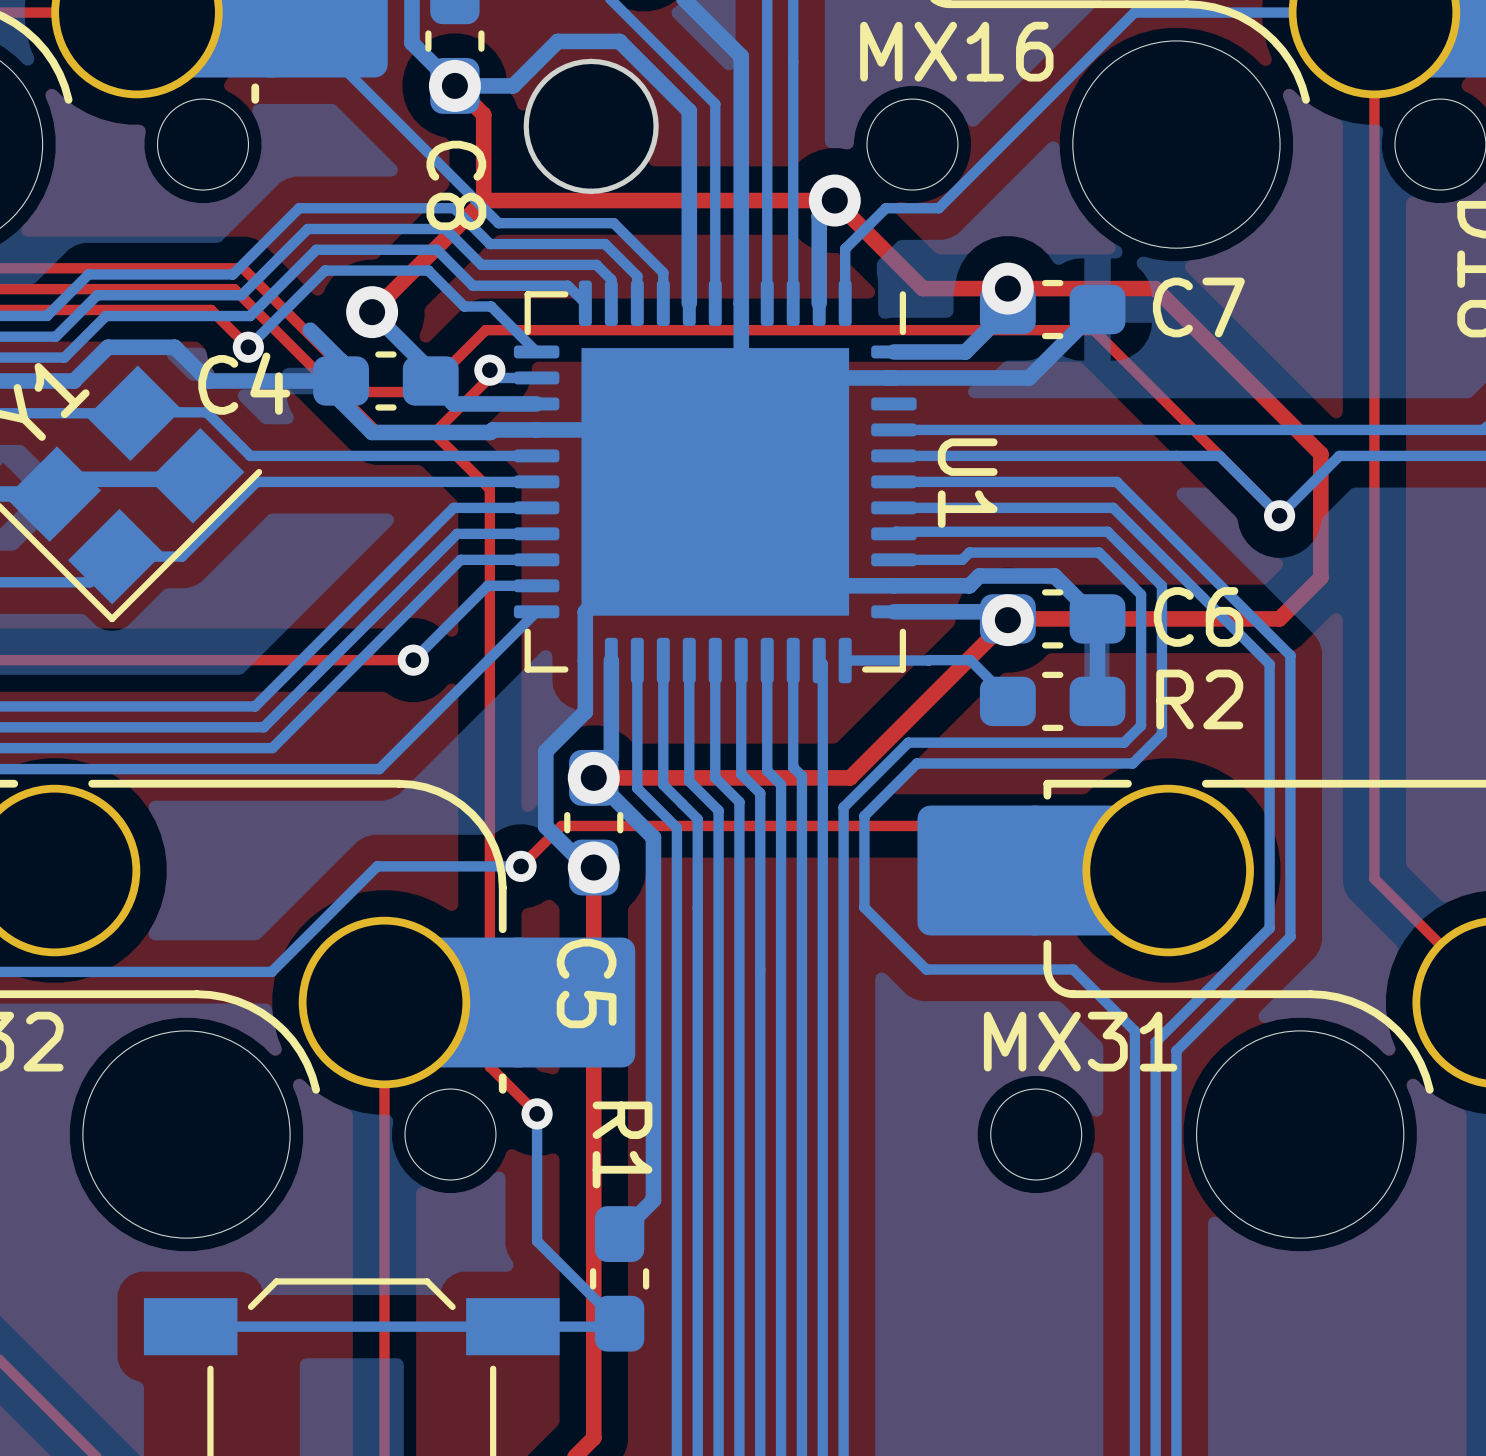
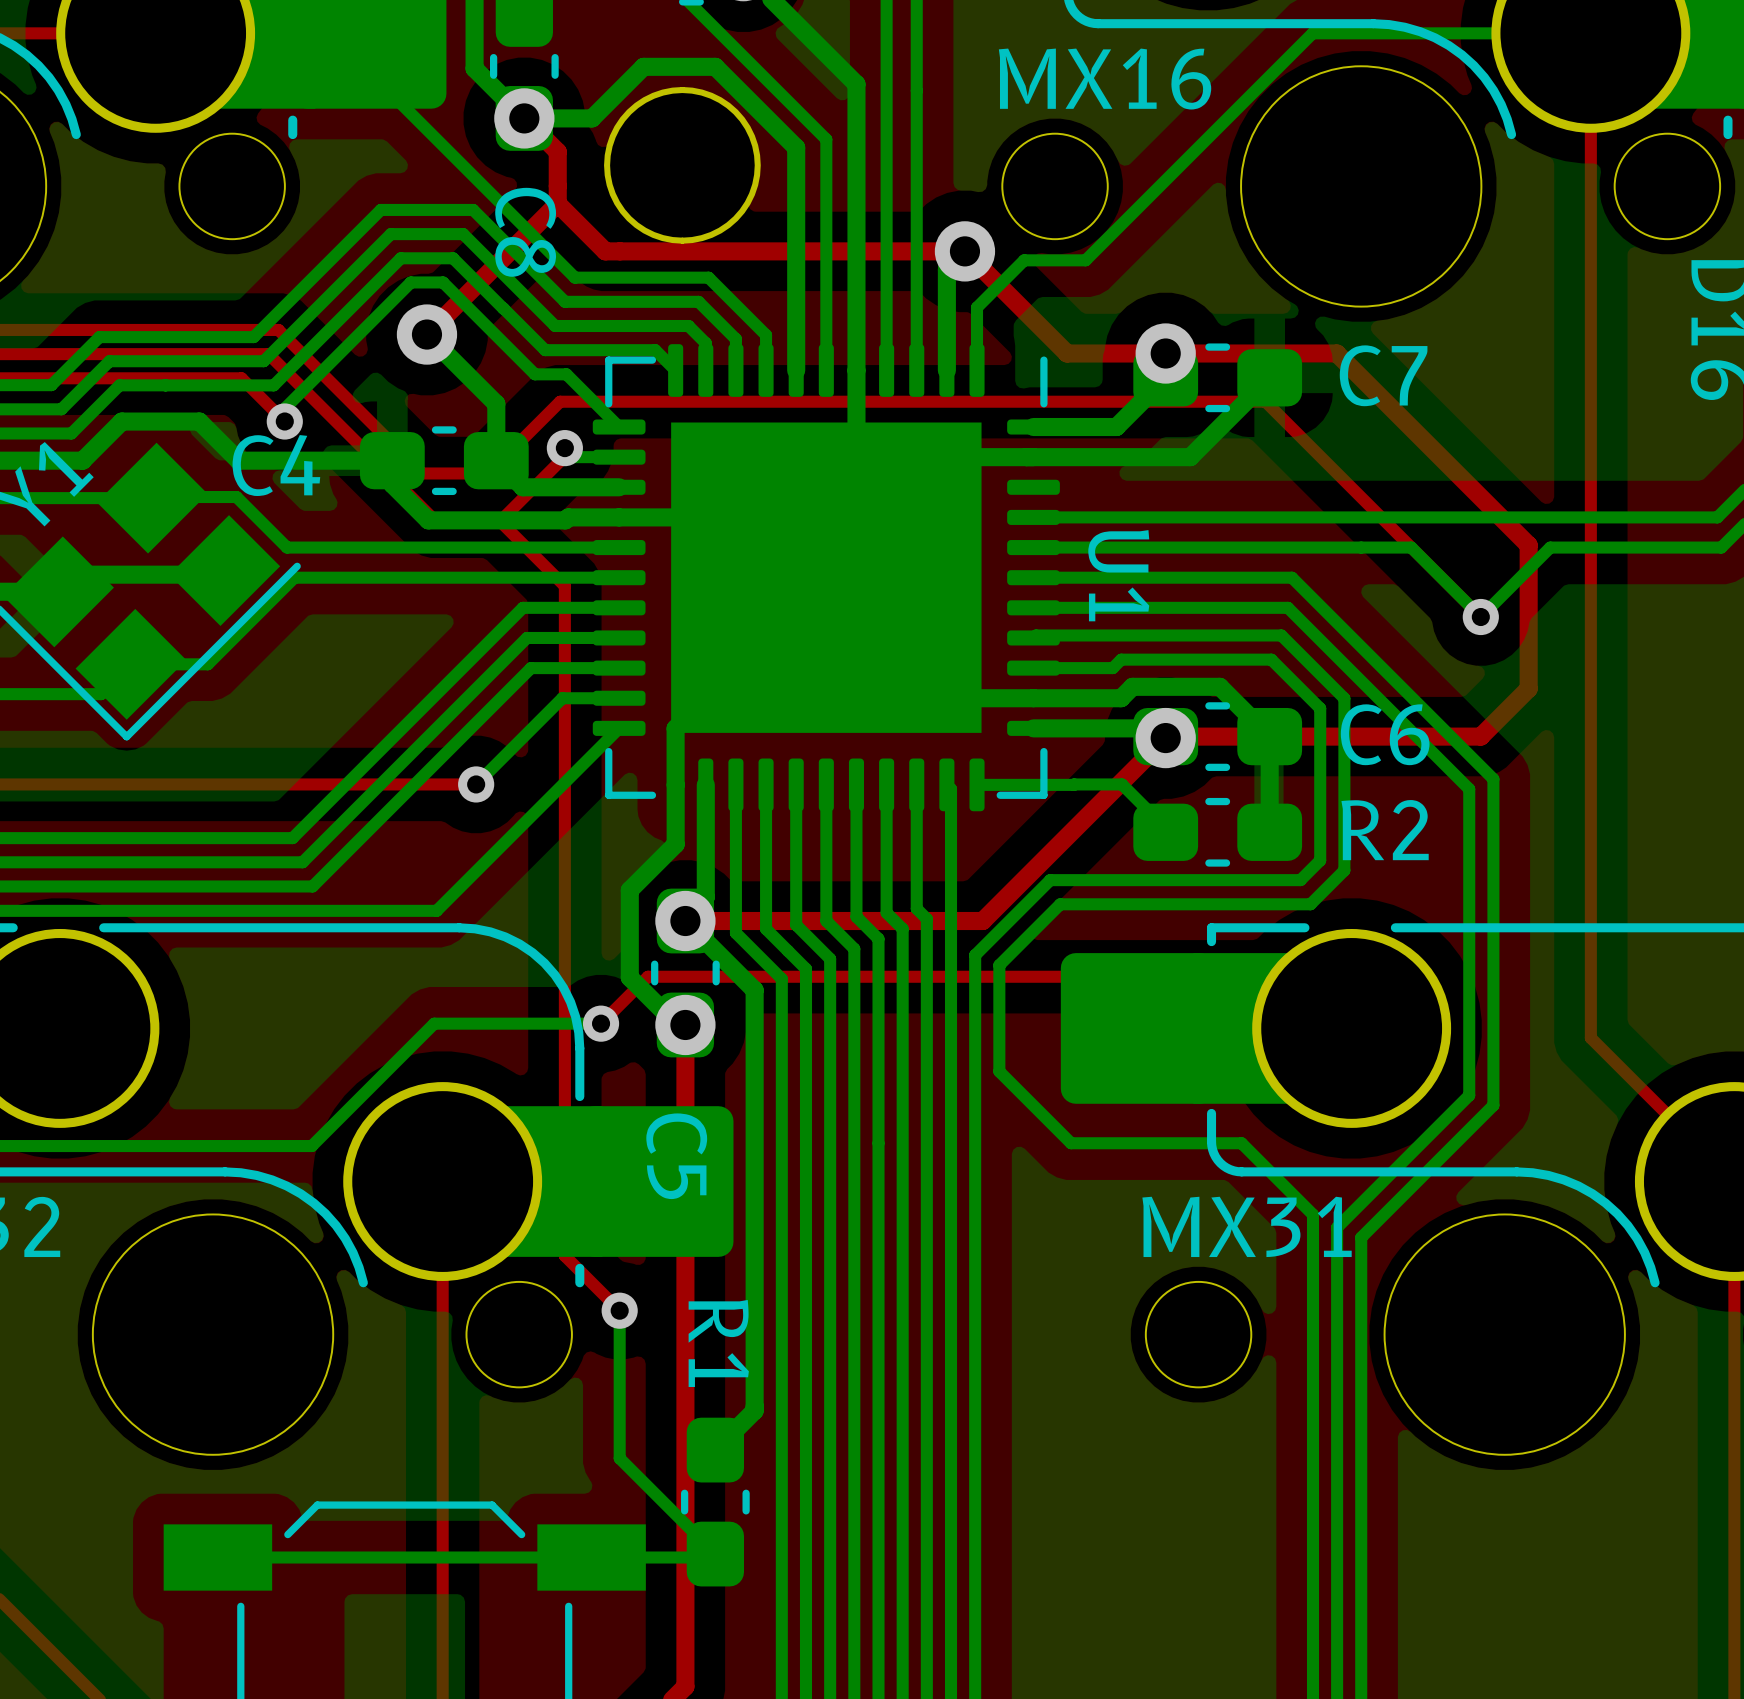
top track: (483, 159) (483, 200) -> none
top track: (483, 200) (372, 312) -> none
top track: (524, 200) (483, 200) -> (605, 251) (557, 203) (426, 334)
bottom track: (454, 208) (299, 208) (232, 274) (221, 274) -> (523, 260) (473, 209) (380, 209) (253, 337)
bottom track: (445, 228) (307, 228) (241, 295) (230, 295) -> (513, 284) (463, 234) (390, 234) (263, 361)
bottom track: (436, 249) (316, 249) (250, 316) (238, 316) -> (503, 308) (453, 258) (400, 258) (273, 385)
bottom track: (428, 270) (325, 270) (248, 347) -> (493, 332) (443, 282) (410, 282) (284, 408) (284, 421)
bottom track: (372, 312) (430, 370) -> (426, 334) (496, 403) (496, 448)
via position: (372, 312) -> (426, 334)
bottom track: (310, 330) (341, 361) (341, 380) -> none

